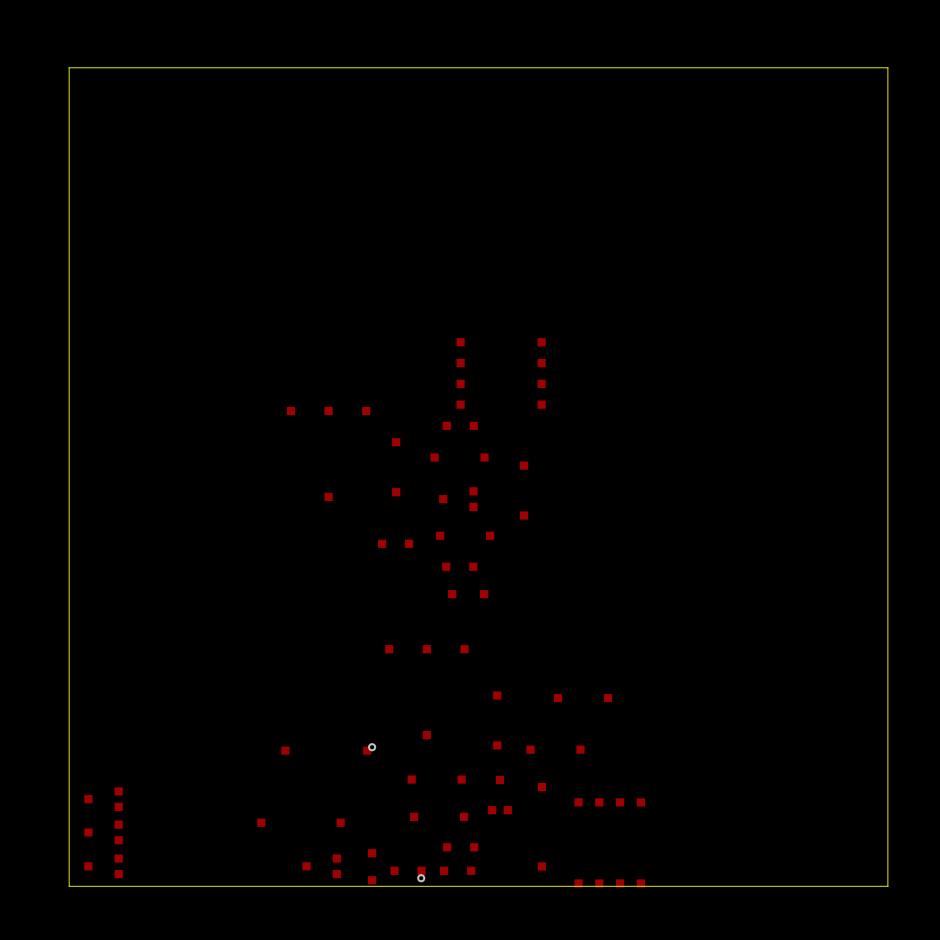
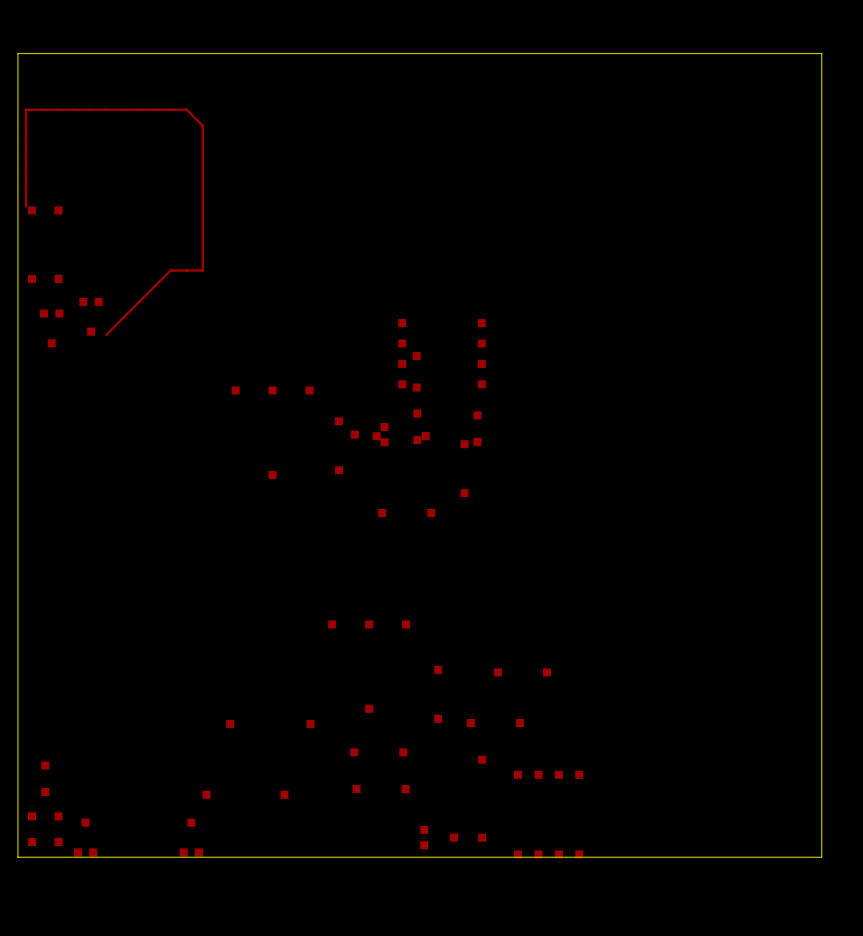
top track: none -> (26, 206) (26, 109) (186, 109) (202, 125) (202, 270) (170, 270) (106, 334)
part: none -> (45, 210)
part: none -> (45, 279)
part: none -> (91, 316)
part: none -> (51, 328)
part rotation: 0° (460, 425) -> 90° clockwise (417, 426)
part position: (460, 425) -> (417, 426)
part: none -> (477, 428)
part position: (458, 499) -> (369, 434)
part: (395, 543) -> none
part: (459, 566) -> none
part rotation: 0° (468, 594) -> 90° clockwise (416, 371)
part position: (468, 594) -> (416, 371)
via: (372, 747) -> none
part footprint: [84, 787, 123, 812] -> [41, 761, 50, 797]
part rotation: 0° (499, 795) -> 90° clockwise (439, 837)
part position: (499, 795) -> (439, 837)
part rotation: 0° (103, 832) -> 90° clockwise (85, 837)
part position: (103, 832) -> (85, 837)
part: none -> (45, 816)
part: (460, 847) -> none
part footprint: [84, 854, 123, 879] -> [28, 837, 63, 847]
part: none -> (191, 837)
part: (321, 866) -> none
part: (372, 866) -> none
part: (408, 870) -> none
part: (457, 870) -> none
via: (421, 878) -> none

